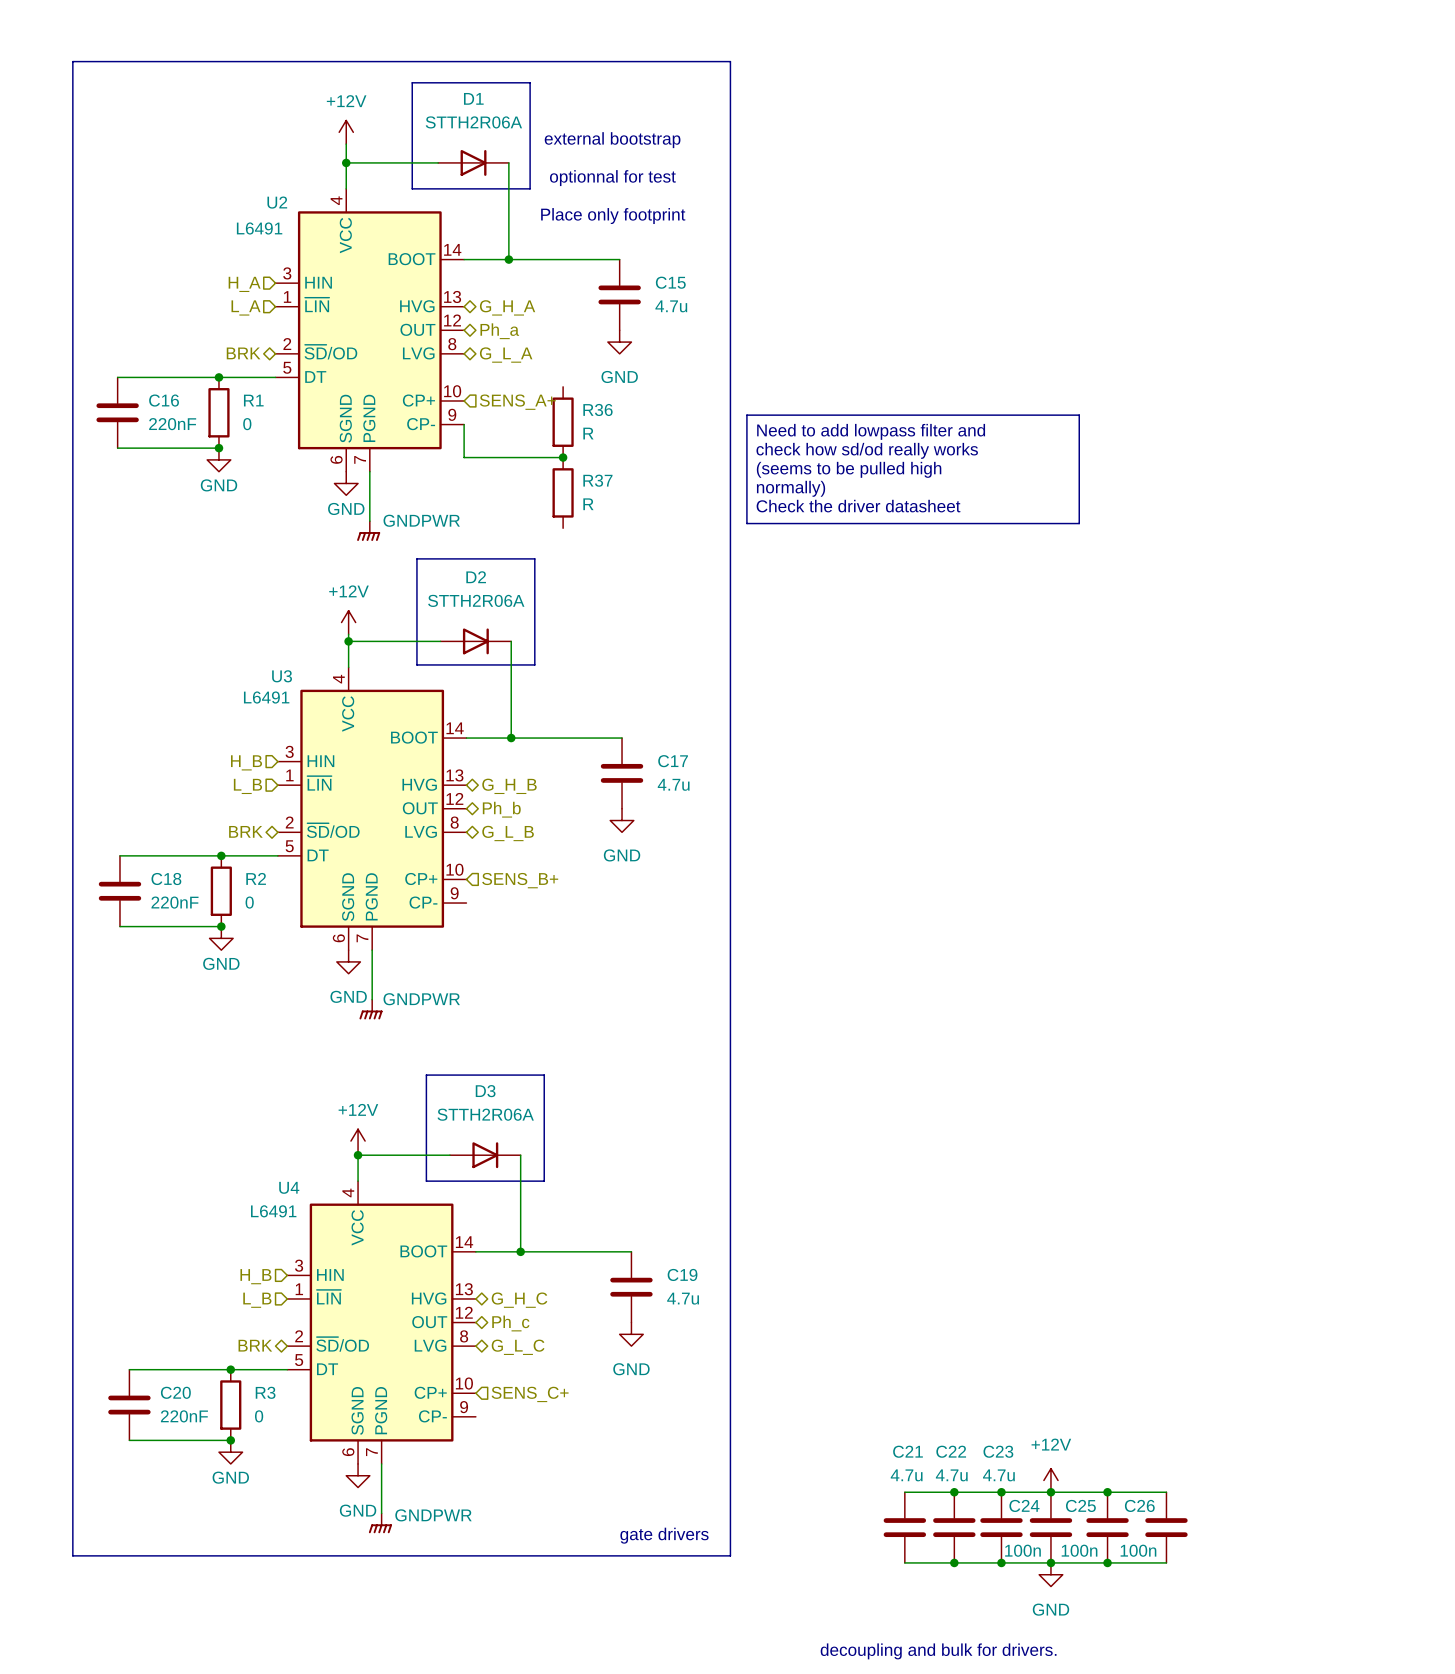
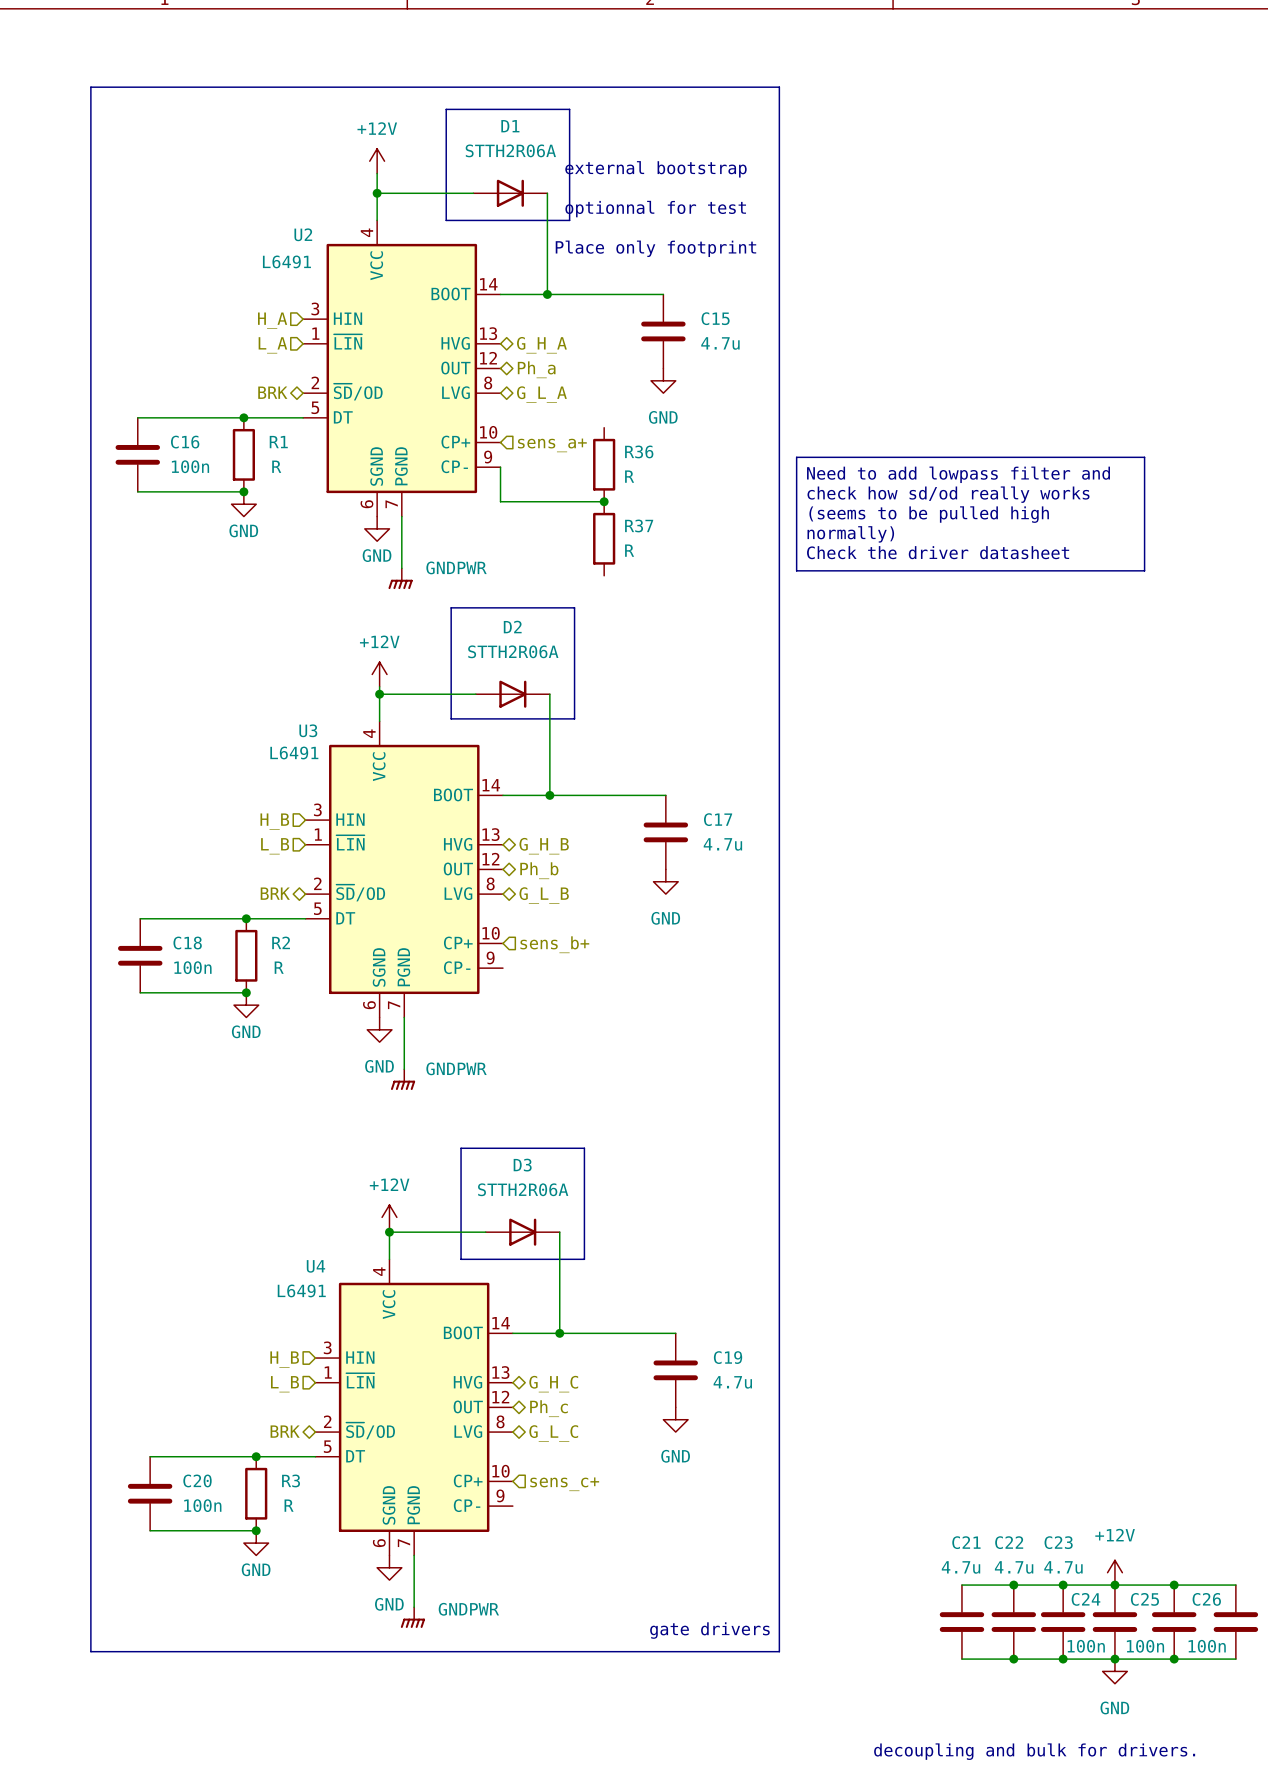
hierarchical label: SENS_A+ (517, 402) -> sens_a+ (552, 445)
C16 value: 220nF (172, 424) -> 100n (190, 466)
R1 value: 0 (247, 424) -> R (276, 466)
hierarchical label: SENS_B+ (520, 880) -> sens_b+ (554, 944)
C18 value: 220nF (175, 902) -> 100n (192, 967)
R2 value: 0 (249, 902) -> R (279, 967)
hierarchical label: SENS_C+ (530, 1394) -> sens_c+ (564, 1484)
C20 value: 220nF (184, 1416) -> 100n (202, 1505)
R3 value: 0 (259, 1416) -> R (289, 1505)

